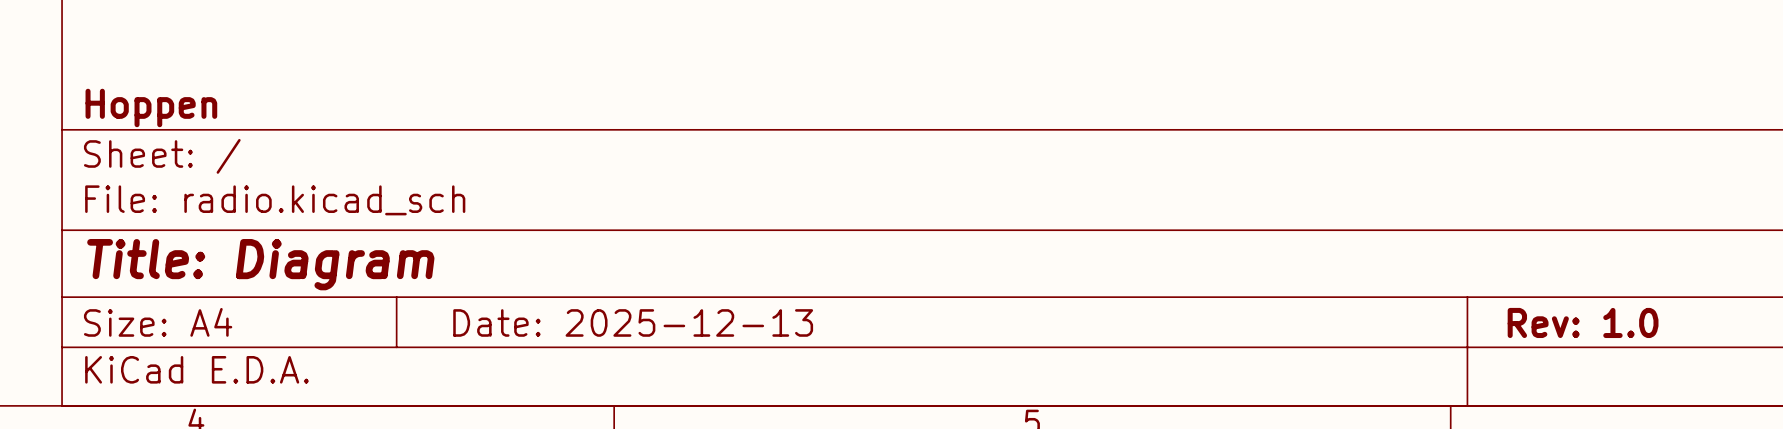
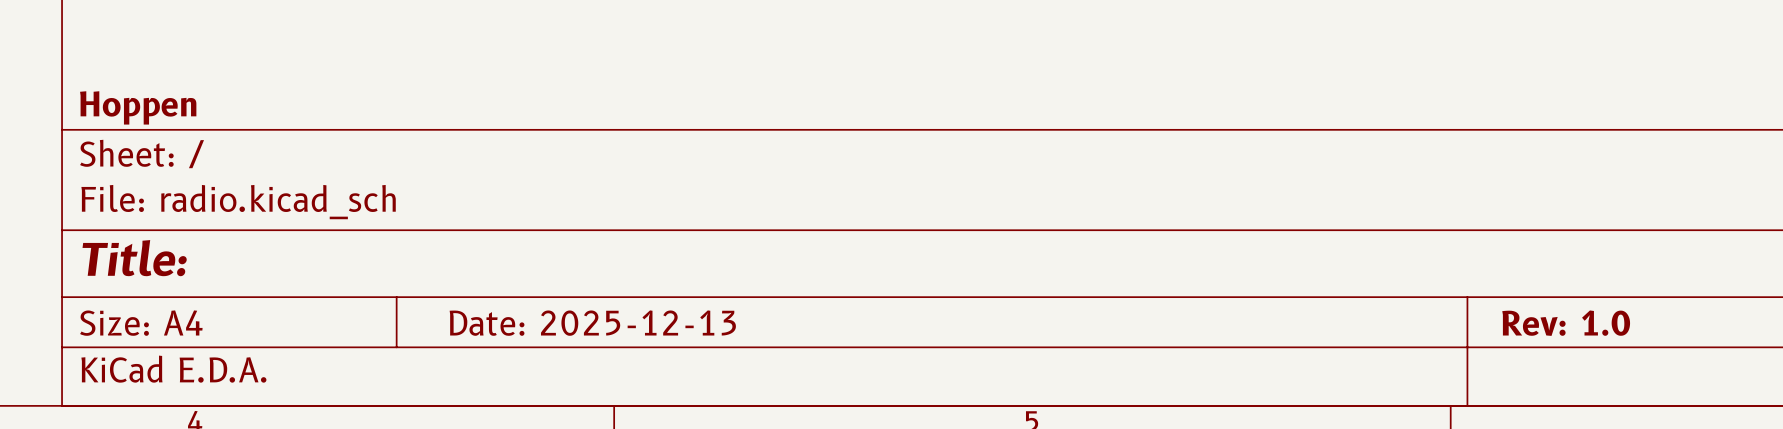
title block: Title: Diagram (260, 264) -> Title: (134, 258)

